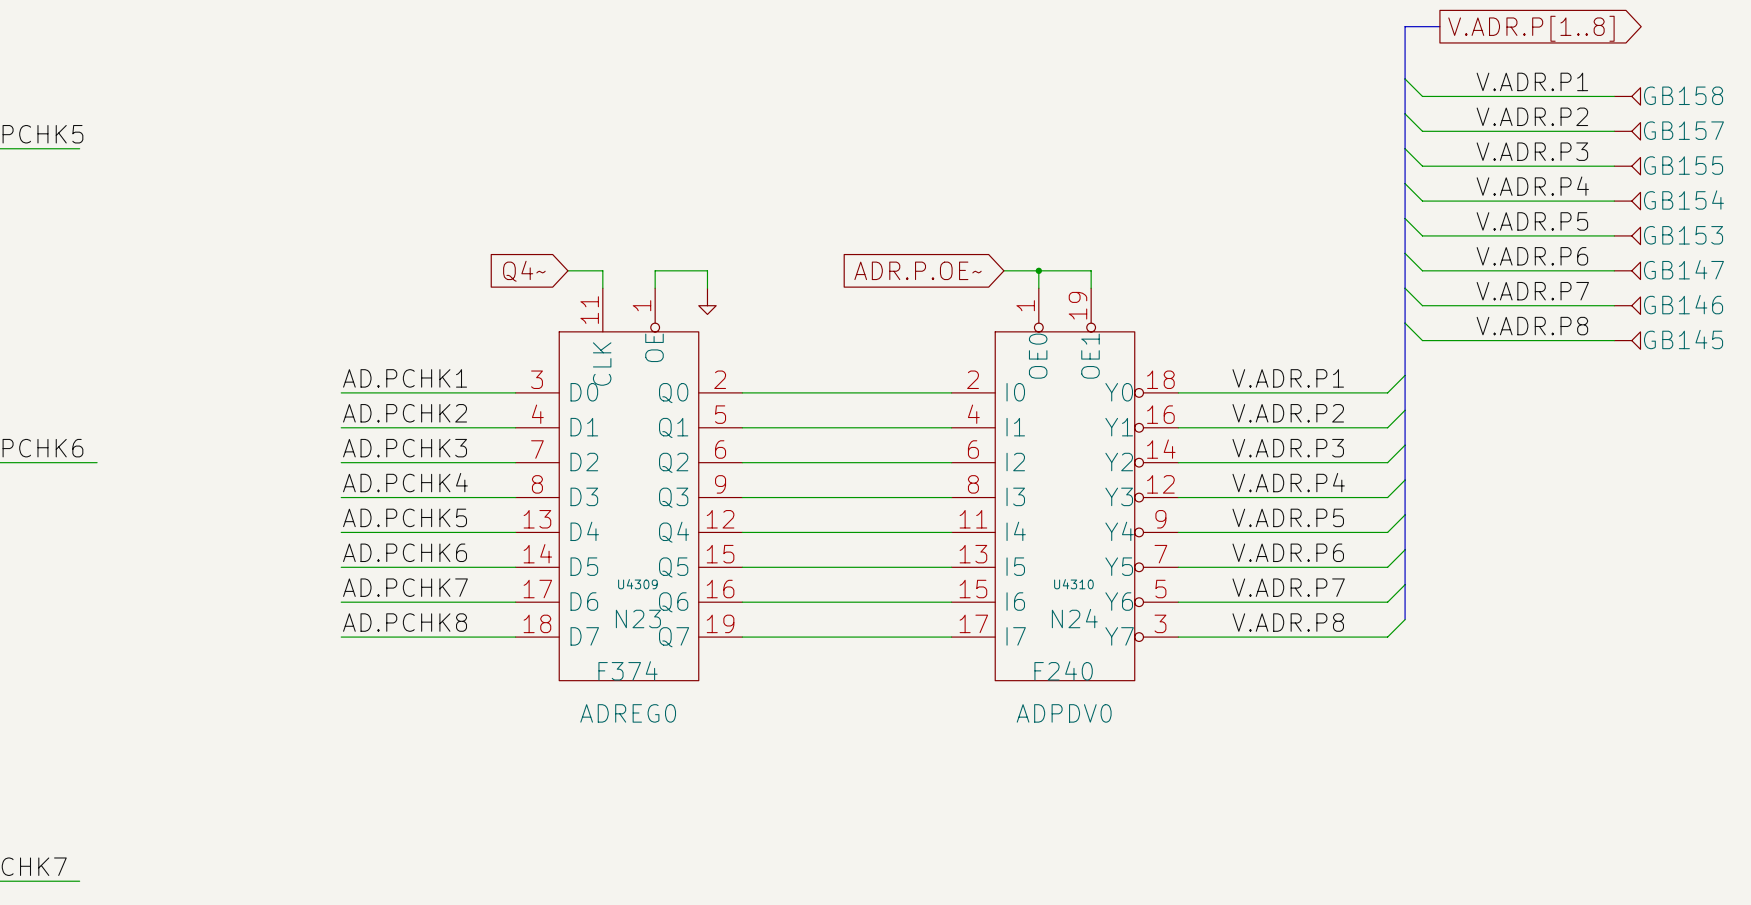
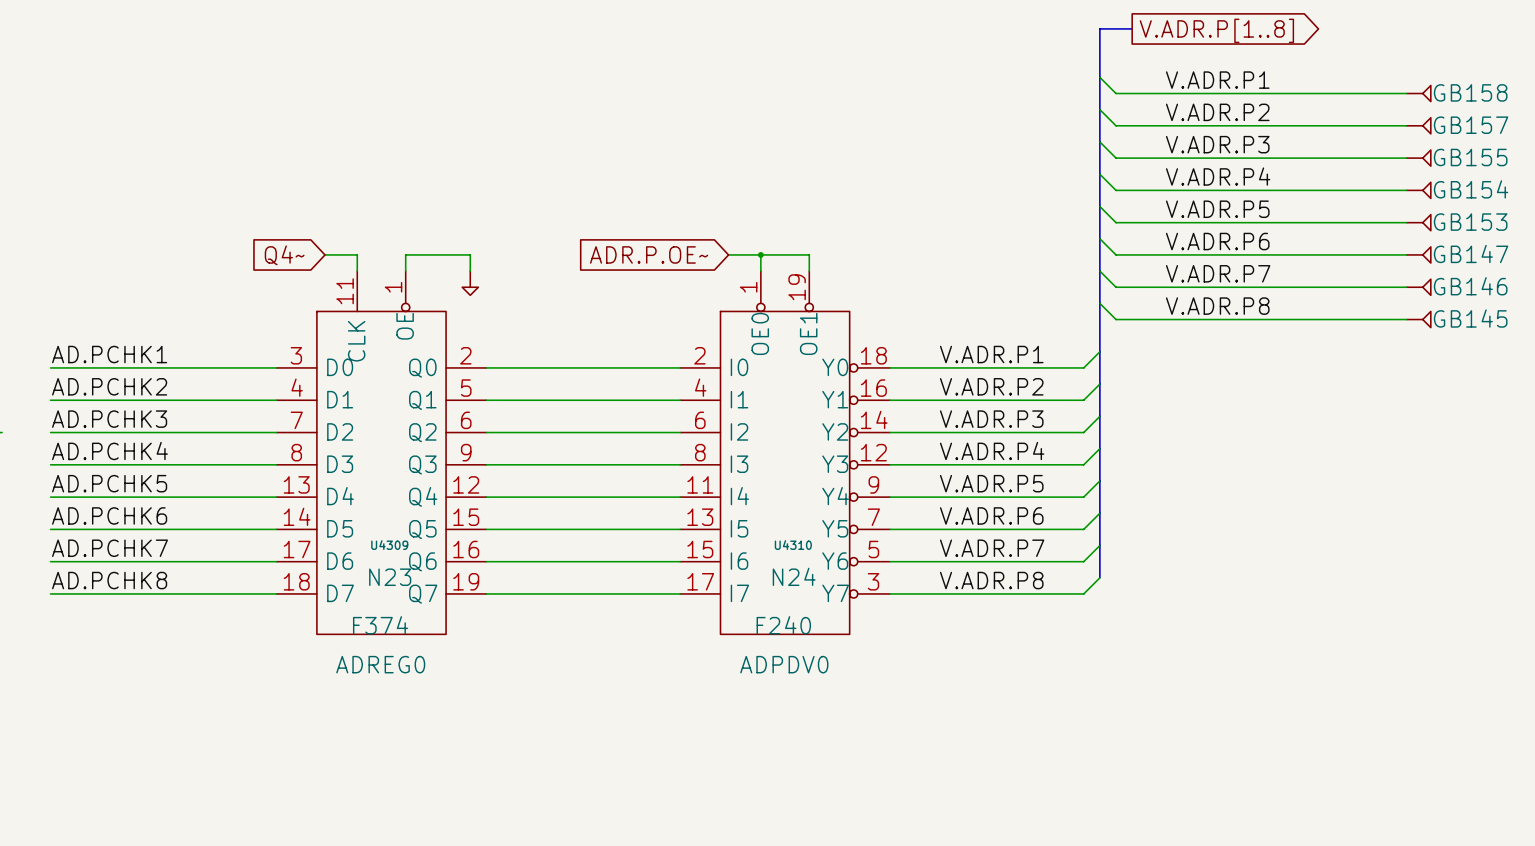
bus: (1439, 26) (1405, 26) (1405, 619) -> (1132, 28) (1099, 28) (1099, 577)
global label position: V.ADR.P[1..8] (1531, 28) -> V.ADR.P[1..8] (1216, 30)
wire: (1405, 78) (1422, 96) -> (1099, 77) (1116, 93) (1229, 93)
label position: V.ADR.P1 (1532, 81) -> V.ADR.P1 (1217, 80)
wire: (1405, 113) (1422, 131) -> (1099, 109) (1116, 125) (1229, 125)
label position: V.ADR.P2 (1532, 116) -> V.ADR.P2 (1217, 112)
wire: (1405, 148) (1422, 166) -> (1099, 141) (1116, 158) (1229, 158)
label position: V.ADR.P3 (1532, 151) -> V.ADR.P3 (1217, 144)
wire: (1405, 183) (1422, 201) -> (1099, 174) (1116, 190) (1229, 190)
label position: V.ADR.P4 (1532, 186) -> V.ADR.P4 (1218, 176)
wire: (1405, 218) (1422, 235) -> (1099, 206) (1116, 222) (1229, 222)
label position: V.ADR.P5 (1532, 221) -> V.ADR.P5 (1217, 209)
wire: (1405, 253) (1422, 270) -> (1099, 238) (1116, 254) (1229, 254)
label position: V.ADR.P6 (1532, 256) -> V.ADR.P6 (1217, 241)
wire: none -> (324, 254) (357, 254) (357, 271)
wire: none -> (437, 254) (405, 254) (405, 271)
junction: none -> (760, 254)
global label position: ADR.P.OE~ (918, 270) -> ADR.P.OE~ (649, 254)
wire: (1003, 270) (1091, 270) (1091, 288) -> (728, 254) (809, 254) (809, 271)
wire: (1038, 270) (1038, 288) -> (760, 254) (760, 271)
junction: (1038, 270) -> none
global label position: Q4~ (524, 271) -> Q4~ (284, 255)
wire: (655, 288) (655, 270) (707, 270) (707, 288) -> none
wire: (1405, 288) (1422, 305) -> (1099, 271) (1116, 287) (1229, 287)
label position: V.ADR.P7 (1532, 291) -> V.ADR.P7 (1218, 273)
power symbol position: (707, 301) -> (470, 283)
wire: (1405, 323) (1422, 340) -> (1099, 303) (1116, 319) (1229, 319)
label position: V.ADR.P8 (1532, 326) -> V.ADR.P8 (1217, 306)
wire: (1405, 375) (1387, 392) (1265, 392) -> (1099, 351) (1083, 367)
label: none -> AD.PCHK1 (109, 354)
label: AD.PCHK1 (405, 378) -> none
label position: V.ADR.P1 (1288, 378) -> V.ADR.P1 (991, 354)
wire: none -> (50, 367) (228, 367)
wire: (393, 392) (515, 392) -> none
wire: none -> (486, 367) (599, 367)
wire: (829, 392) (951, 392) -> none
wire: none -> (890, 367) (1003, 367)
wire: (1405, 410) (1387, 427) (1265, 427) -> (1099, 384) (1083, 400)
label: none -> AD.PCHK2 (109, 386)
label: AD.PCHK2 (405, 413) -> none
label position: V.ADR.P2 (1288, 413) -> V.ADR.P2 (991, 386)
wire: none -> (50, 400) (228, 400)
wire: (393, 427) (515, 427) -> none
wire: none -> (486, 400) (599, 400)
wire: (829, 427) (951, 427) -> none
wire: none -> (890, 400) (1003, 400)
wire: (1405, 445) (1387, 462) (1265, 462) -> (1099, 416) (1083, 432)
label: none -> AD.PCHK3 (109, 419)
label: AD.PCHK3 (405, 448) -> none
label position: V.ADR.P3 (1288, 448) -> V.ADR.P3 (991, 419)
wire: none -> (50, 432) (228, 432)
wire: (393, 462) (515, 462) -> none
wire: none -> (486, 432) (599, 432)
wire: (829, 462) (951, 462) -> none
wire: none -> (890, 432) (1003, 432)
wire: (1405, 480) (1387, 497) (1265, 497) -> (1099, 448) (1083, 464)
label: none -> AD.PCHK4 (109, 451)
label: AD.PCHK4 (405, 482) -> none
label position: V.ADR.P4 (1288, 482) -> V.ADR.P4 (992, 451)
U4309 position: (628, 484) -> (381, 452)
U4310 position: (1064, 484) -> (785, 452)
wire: none -> (50, 464) (228, 464)
wire: (393, 497) (515, 497) -> none
wire: none -> (486, 464) (599, 464)
wire: (829, 497) (951, 497) -> none
wire: none -> (890, 464) (1003, 464)
wire: (1405, 514) (1387, 532) (1265, 532) -> (1099, 480) (1083, 497)
label: none -> AD.PCHK5 (109, 483)
label: AD.PCHK5 (405, 517) -> none
label position: V.ADR.P5 (1288, 517) -> V.ADR.P5 (991, 483)
wire: none -> (50, 497) (228, 497)
wire: (393, 532) (515, 532) -> none
wire: none -> (486, 497) (599, 497)
wire: (829, 532) (951, 532) -> none
wire: none -> (890, 497) (1003, 497)
wire: (1405, 549) (1387, 567) (1265, 567) -> (1099, 513) (1083, 529)
label: none -> AD.PCHK6 (109, 515)
label: AD.PCHK6 (405, 552) -> none
label position: V.ADR.P6 (1288, 552) -> V.ADR.P6 (991, 515)
wire: none -> (50, 529) (228, 529)
wire: (393, 567) (515, 567) -> none
wire: none -> (486, 529) (599, 529)
wire: (829, 567) (951, 567) -> none
wire: none -> (890, 529) (1003, 529)
wire: (1405, 584) (1387, 602) (1265, 602) -> (1099, 545) (1083, 561)
label: none -> AD.PCHK7 (109, 548)
label: AD.PCHK7 (405, 587) -> none
label position: V.ADR.P7 (1288, 587) -> V.ADR.P7 (992, 548)
wire: none -> (50, 561) (228, 561)
wire: (393, 602) (515, 602) -> none
wire: none -> (486, 561) (599, 561)
wire: (829, 602) (951, 602) -> none
wire: none -> (890, 561) (1003, 561)
wire: (1405, 619) (1387, 637) (1265, 637) -> (1099, 577) (1083, 593)
label: none -> AD.PCHK8 (109, 580)
label: AD.PCHK8 (405, 622) -> none
label position: V.ADR.P8 (1288, 622) -> V.ADR.P8 (991, 580)
wire: none -> (50, 593) (228, 593)
wire: (393, 637) (515, 637) -> none
wire: none -> (486, 593) (599, 593)
wire: (829, 637) (951, 637) -> none
wire: none -> (890, 593) (1003, 593)

